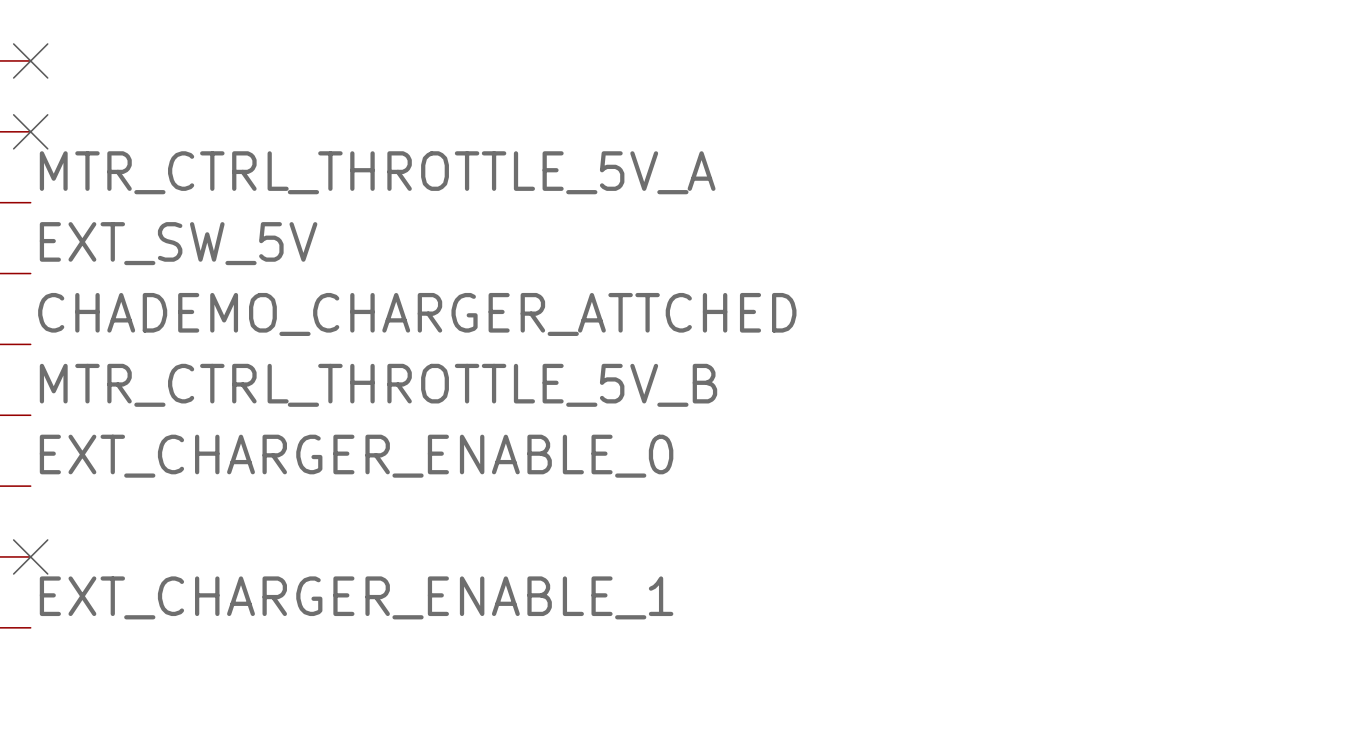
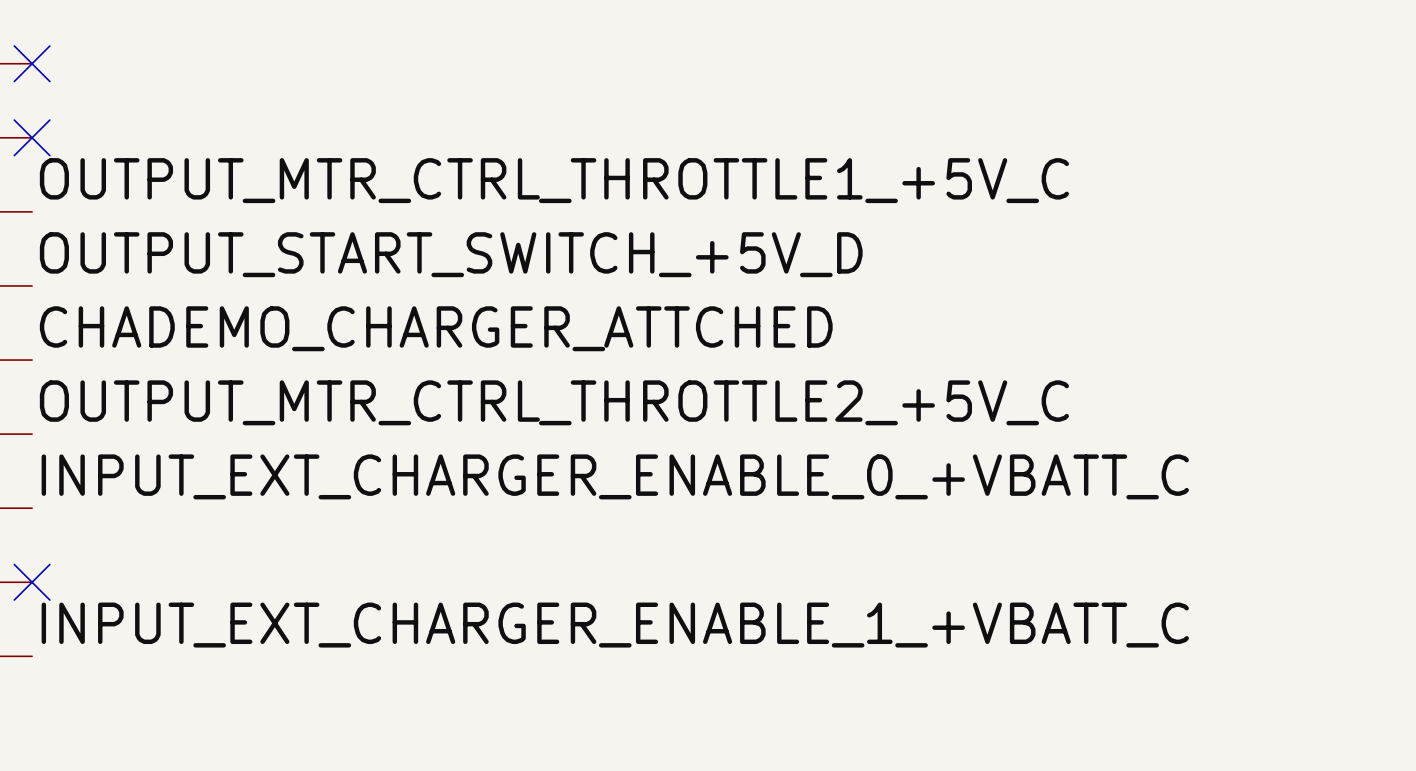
label: MTR_CTRL_THROTTLE_5V_A (377, 172) -> OUTPUT_MTR_CTRL_THROTTLE1_+5V_C (554, 180)
label: EXT_SW_5V (178, 243) -> OUTPUT_START_SWITCH_+5V_D (451, 254)
label: MTR_CTRL_THROTTLE_5V_B (378, 385) -> OUTPUT_MTR_CTRL_THROTTLE2_+5V_C (554, 402)
label: EXT_CHARGER_ENABLE_0 (356, 456) -> INPUT_EXT_CHARGER_ENABLE_0_+VBATT_C (615, 476)
label: EXT_CHARGER_ENABLE_1 (356, 597) -> INPUT_EXT_CHARGER_ENABLE_1_+VBATT_C (615, 625)

